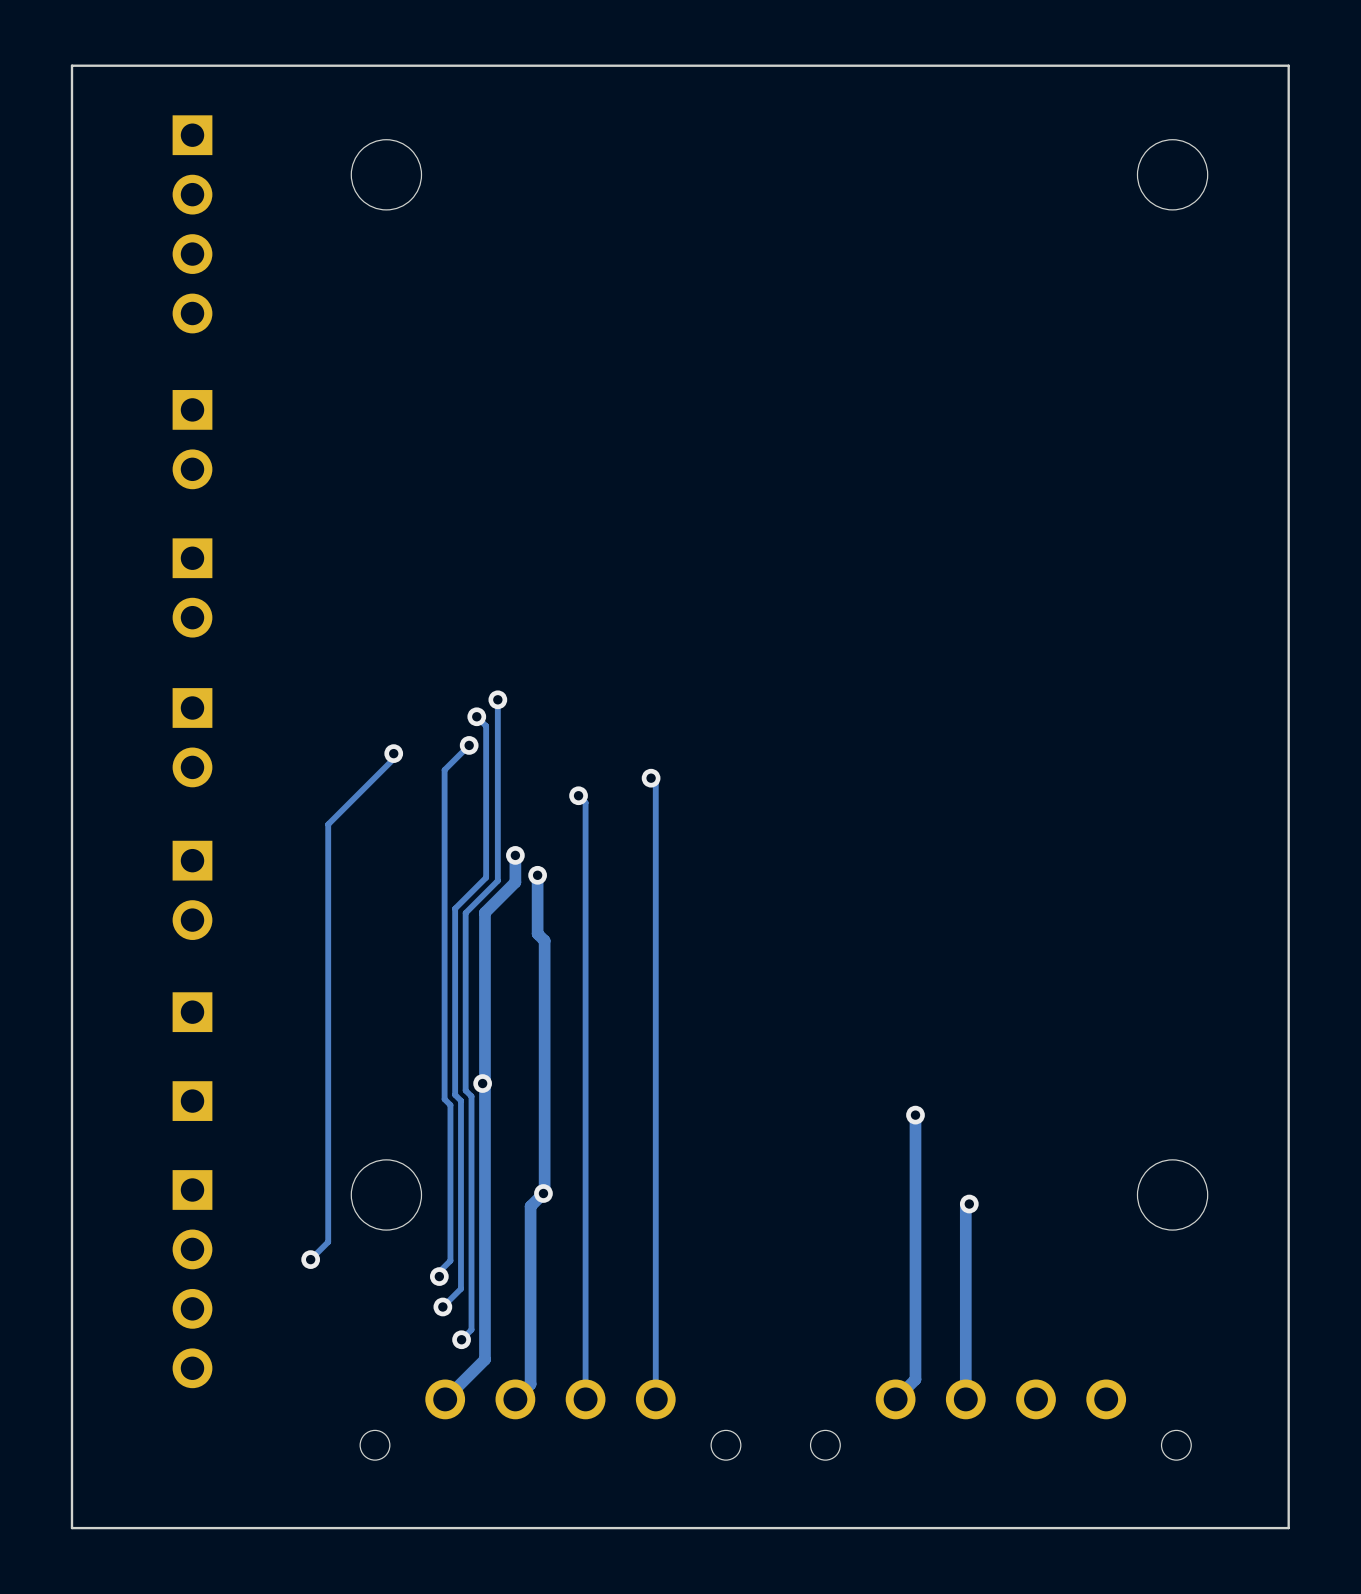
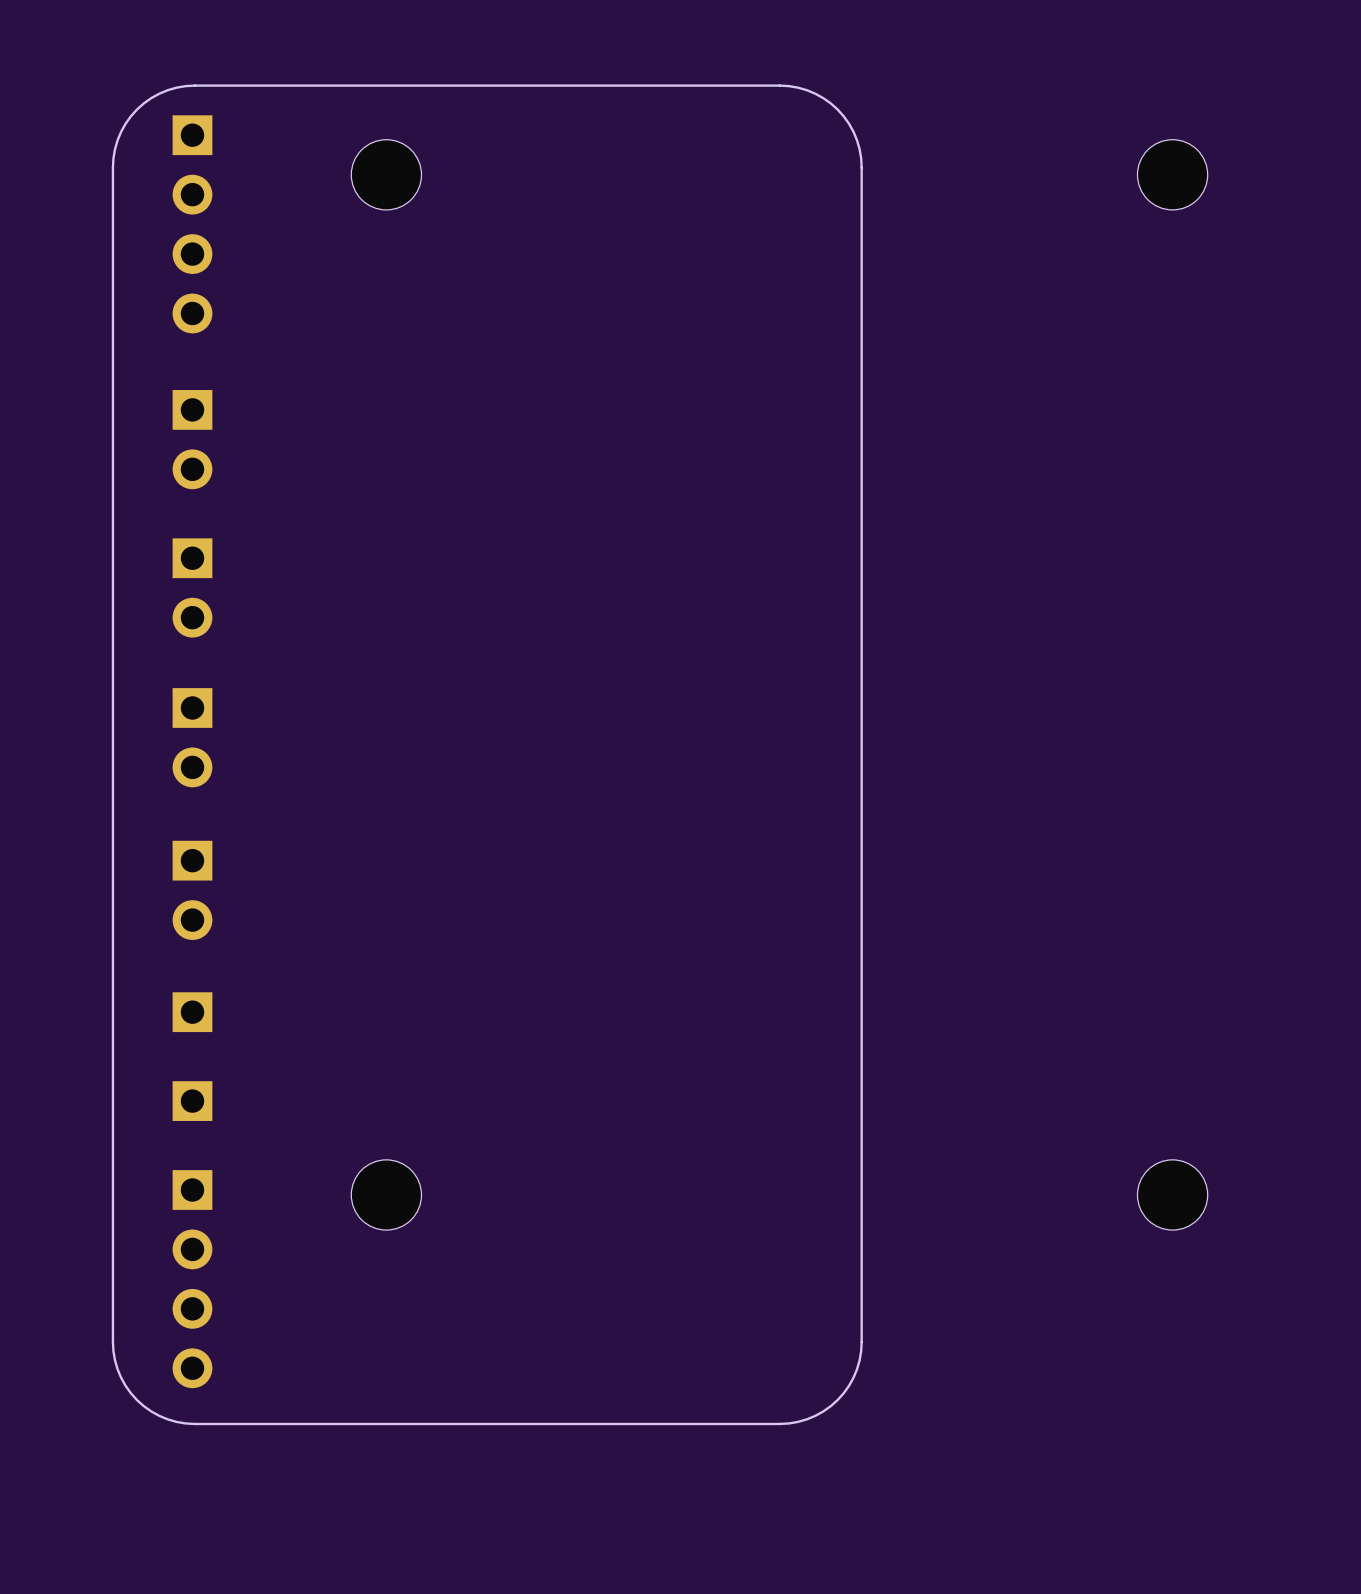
board edge: (1288, 65) (71, 65) (71, 1528) (1288, 1528) (1288, 65) -> (779, 85) (798, 87) (815, 93) (837, 109) (853, 131) (861, 158) (861, 1342) (859, 1360) (853, 1377) (843, 1393) (823, 1411) (798, 1421) (779, 1423) (194, 1423) (176, 1421) (159, 1415) (143, 1406) (125, 1385) (114, 1360) (112, 1342) (112, 167) (114, 149) (121, 131) (130, 116) (151, 98) (167, 90) (185, 86) (779, 85)
track: (497, 699) (497, 880) (465, 913) (465, 1090) (471, 1096) (471, 1329) (461, 1339) -> none
via: (497, 699) -> none
track: (476, 716) (486, 726) (486, 877) (455, 908) (455, 1094) (460, 1100) (460, 1288) (442, 1306) -> none
via: (476, 716) -> none
track: (469, 745) (444, 769) (444, 1099) (450, 1105) (450, 1260) (439, 1271) (439, 1276) -> none
via: (469, 745) -> none
track: (393, 753) (393, 758) (328, 824) (328, 1242) (310, 1259) -> none
via: (393, 753) -> none
track: (651, 778) (655, 782) (655, 1399) -> none
via: (651, 778) -> none
track: (578, 795) (585, 802) (585, 1399) -> none
via: (578, 795) -> none
track: (515, 855) (515, 882) (484, 912) (484, 1359) (445, 1399) -> none
via: (515, 855) -> none
track: (537, 875) (537, 933) (544, 940) (544, 1192) (530, 1206) (530, 1384) (515, 1399) -> none
via: (537, 875) -> none
via: (482, 1083) -> none
track: (915, 1115) (915, 1379) (895, 1399) -> none
via: (915, 1115) -> none
via: (543, 1193) -> none
track: (969, 1204) (965, 1207) (965, 1399) -> none
via: (969, 1204) -> none
via: (310, 1259) -> none
via: (439, 1276) -> none
via: (442, 1306) -> none
via: (461, 1339) -> none
part: (550, 1419) -> none
part: (1000, 1419) -> none

